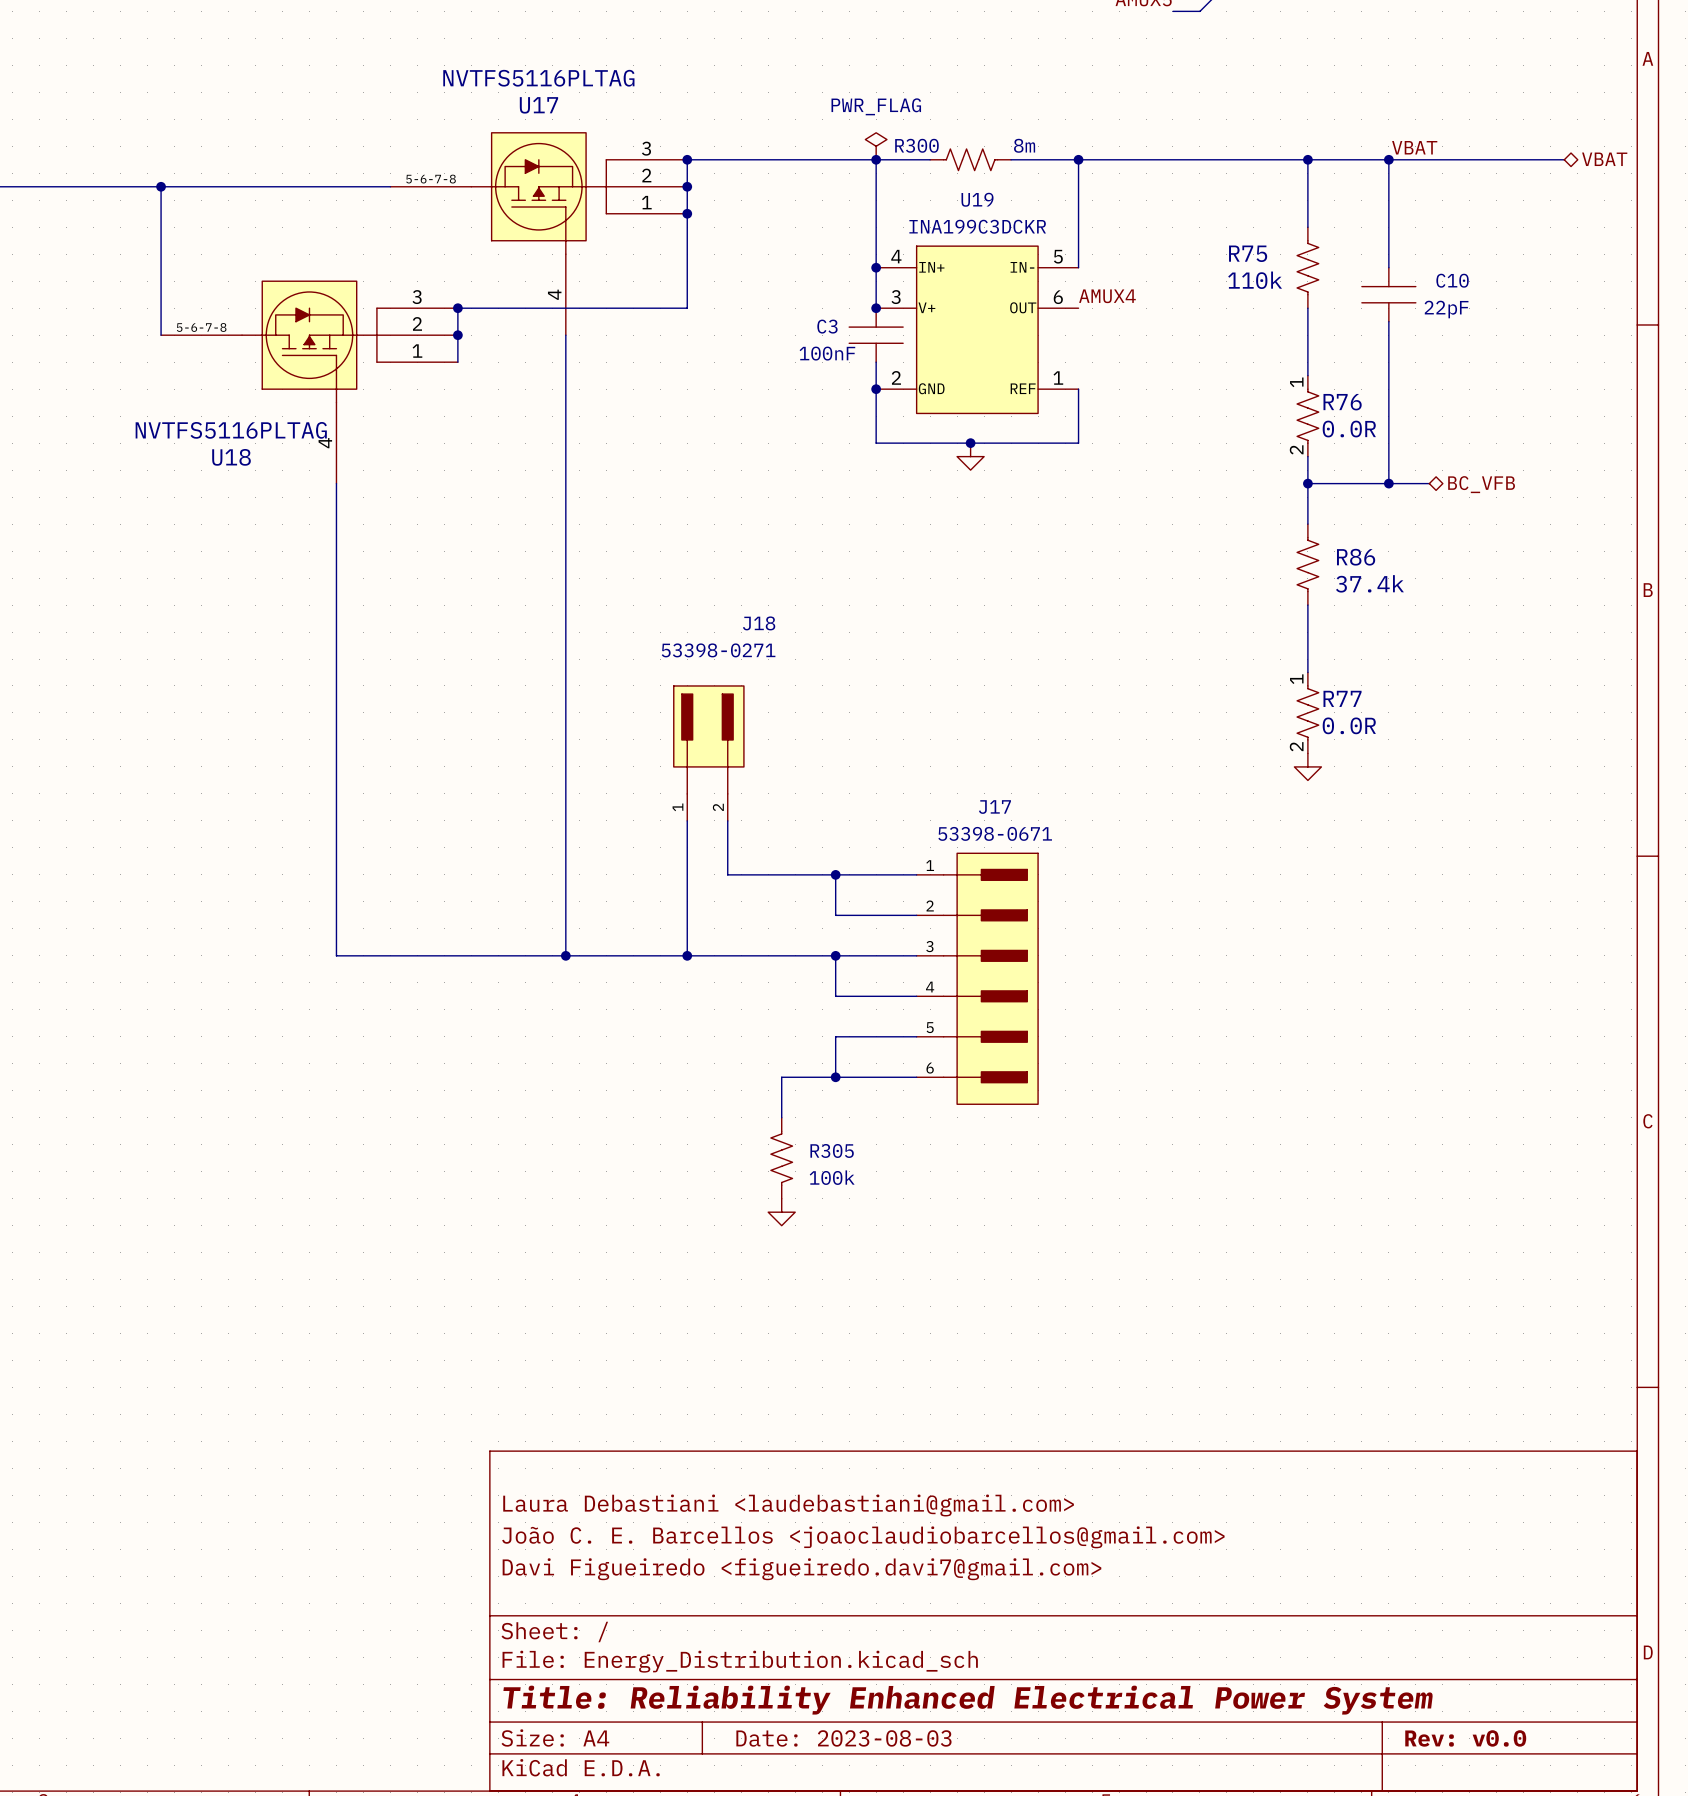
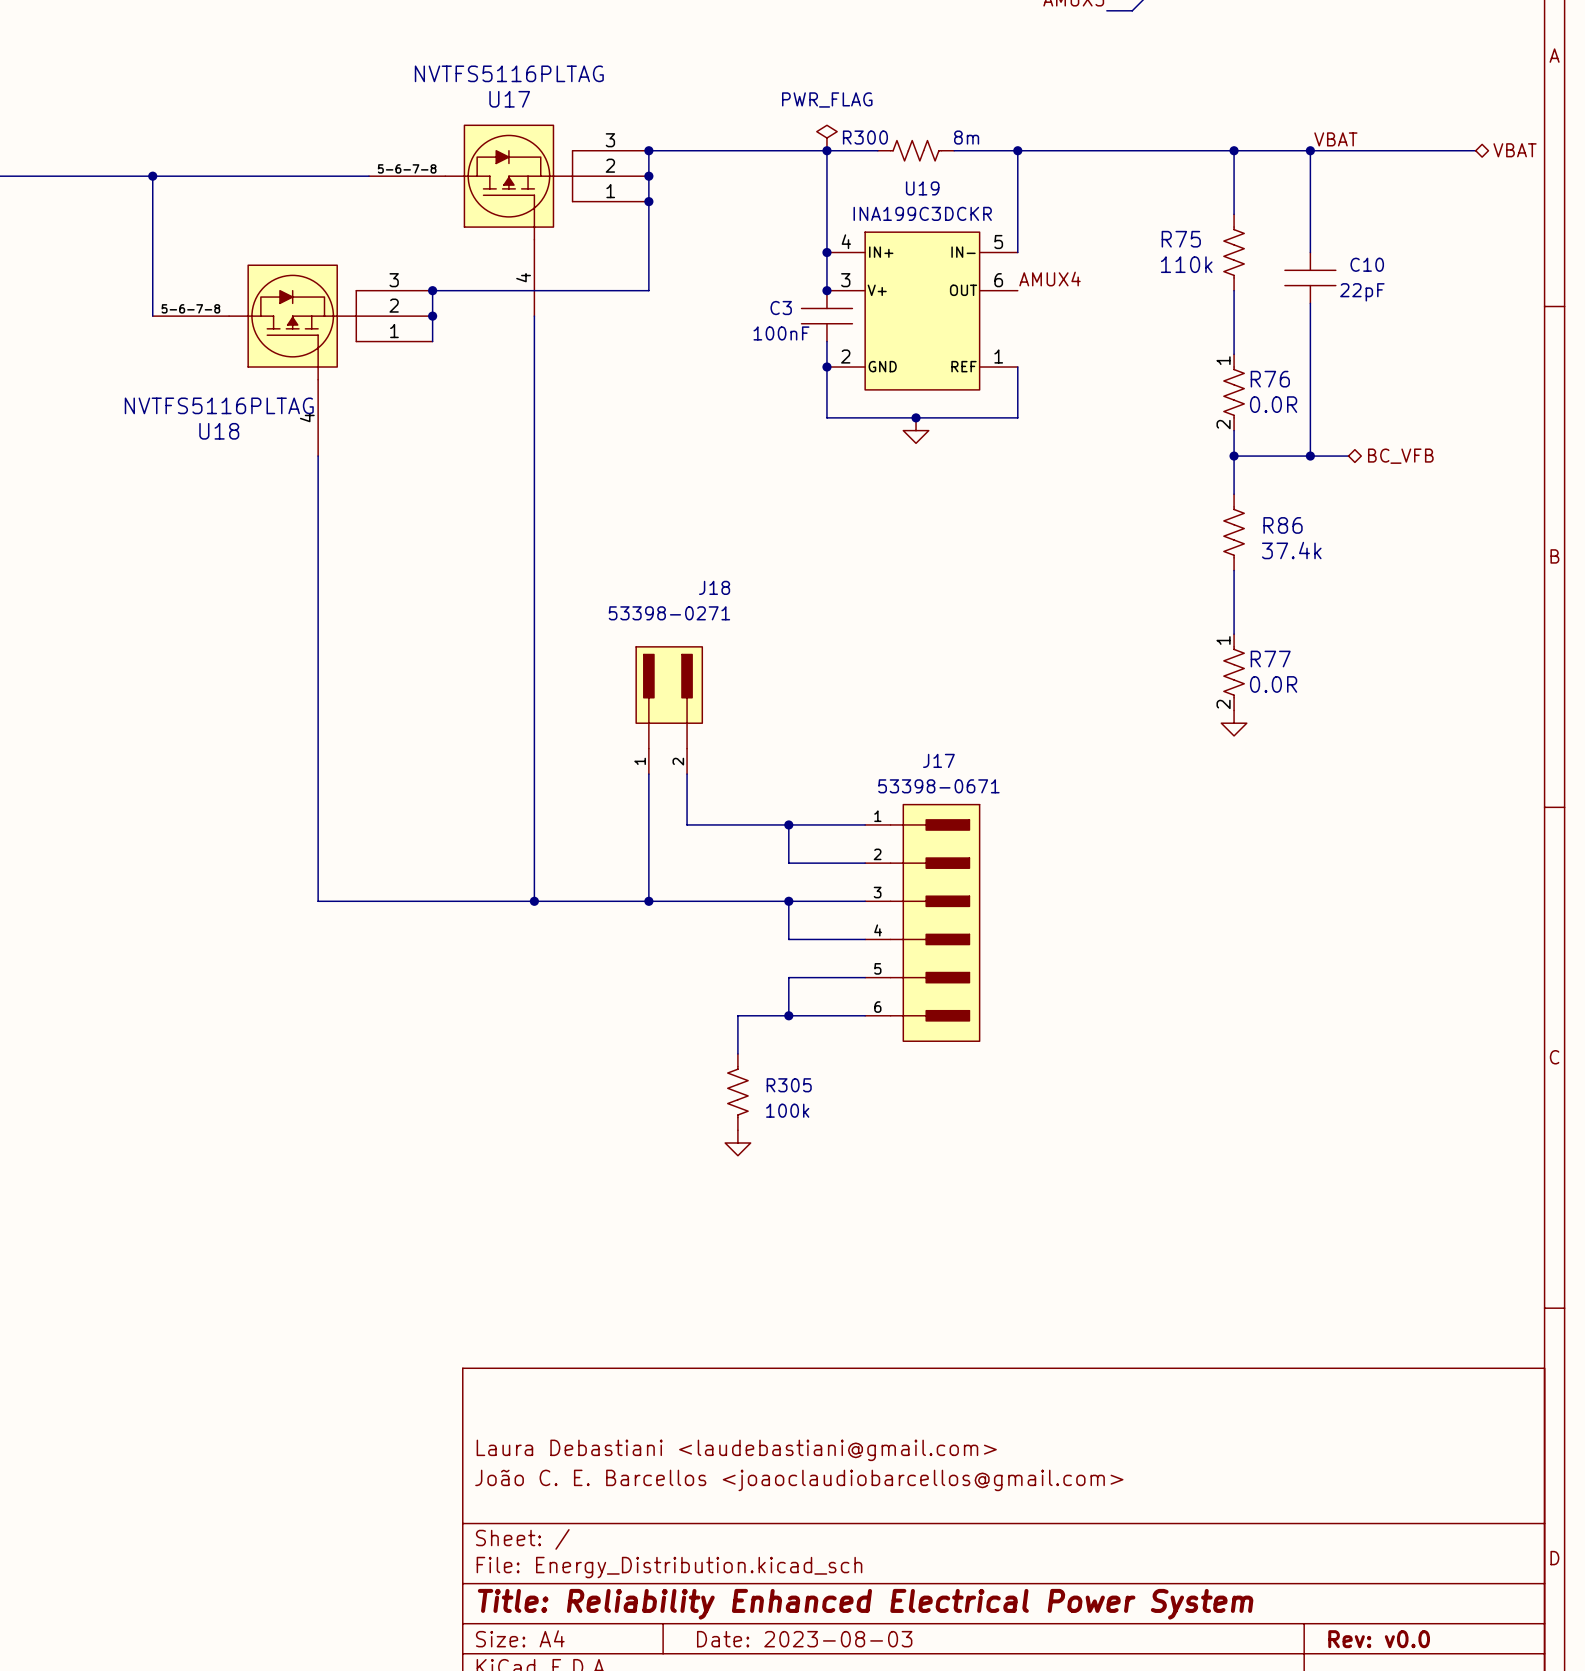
title block: Laura Debastiani <laudebastiani@gmail.com> (788, 1505) -> none
title block: João C. E. Barcellos <joaoclaudiobarcellos@gmail.com> (863, 1537) -> Laura Debastiani <laudebastiani@gmail.com> (736, 1450)
title block: Davi Figueiredo <figueiredo.davi7@gmail.com> (801, 1569) -> João C. E. Barcellos <joaoclaudiobarcellos@gmail.com> (799, 1480)

